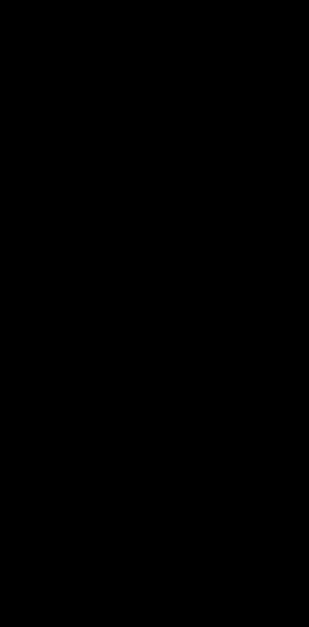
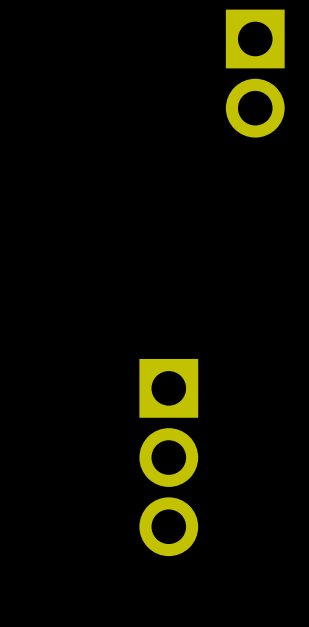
part: none -> (255, 73)
part: none -> (168, 457)

